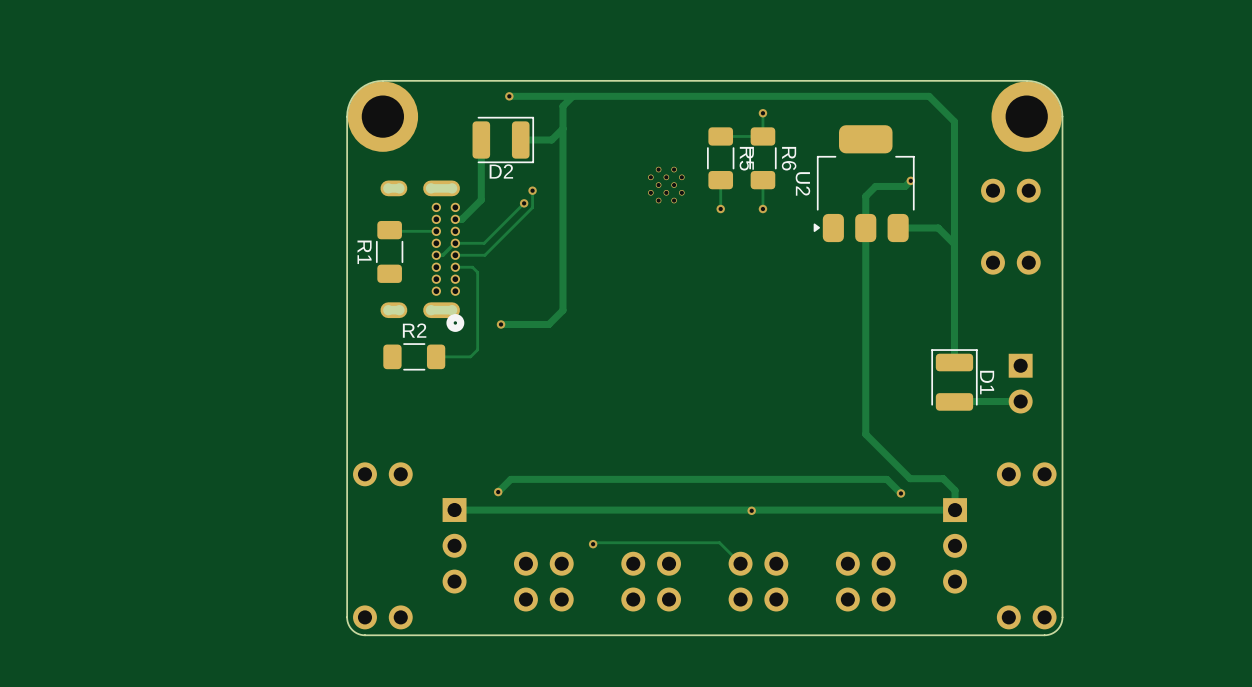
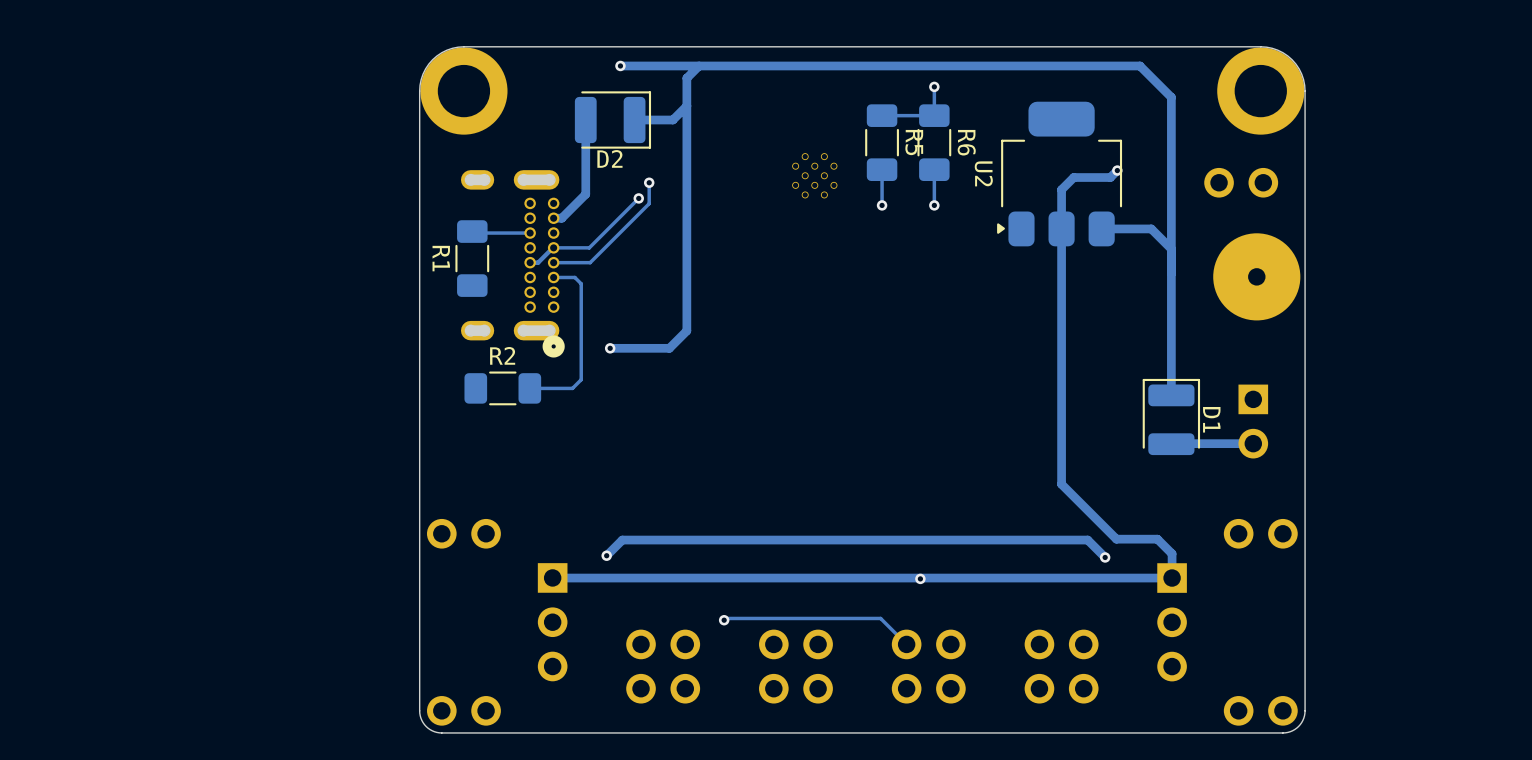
part footprint: [981, 250, 1041, 275] -> [1213, 233, 1301, 321]

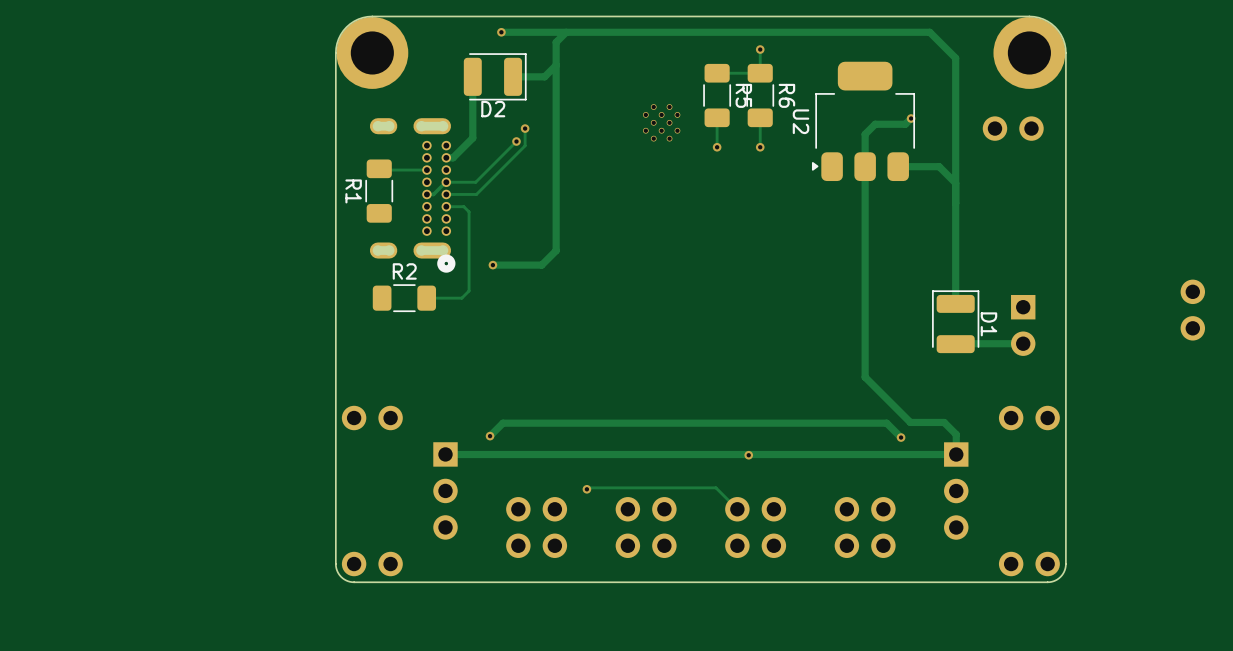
part: (1256, 276) -> none
part: none -> (1192, 310)

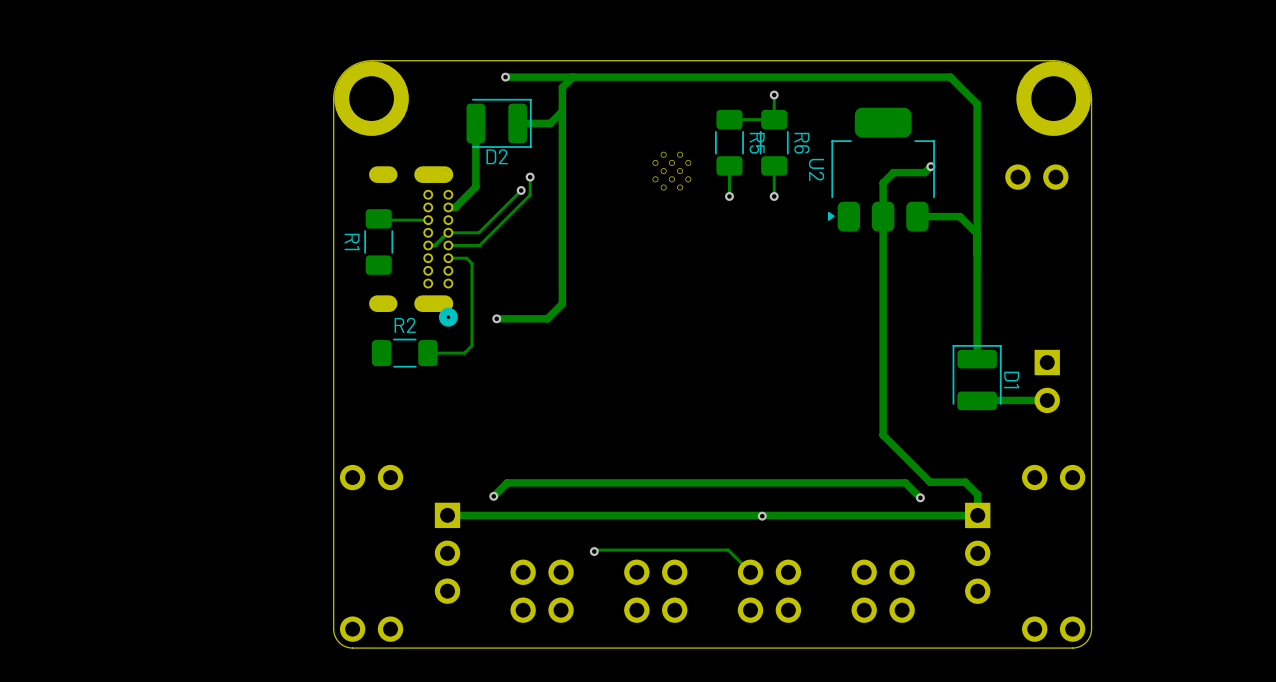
part: (1192, 310) -> none

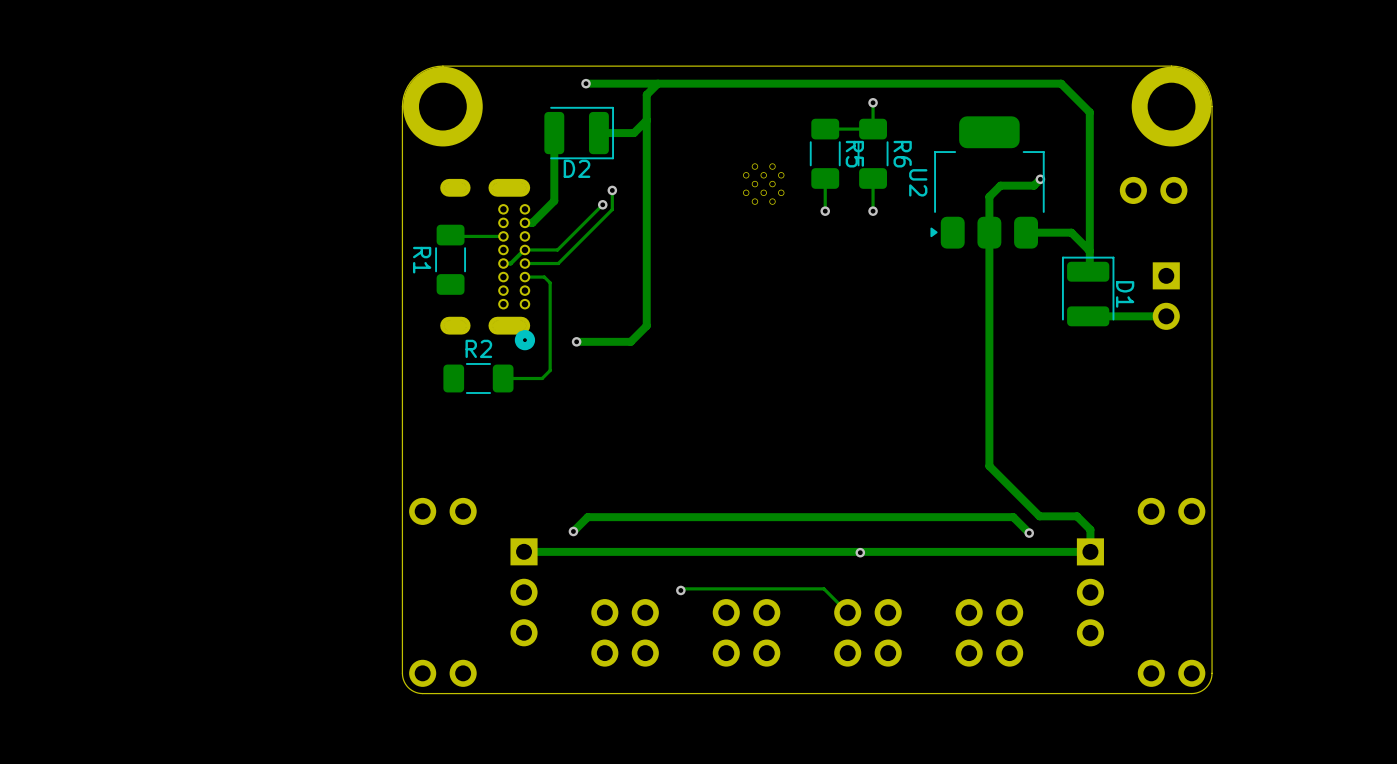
track: (977, 251) (977, 359) -> none
track: none -> (1166, 316) (1088, 316)
D1 position: (977, 377) -> (1088, 291)
part position: (1047, 381) -> (1166, 296)
track: (1047, 400) (977, 400) -> none

